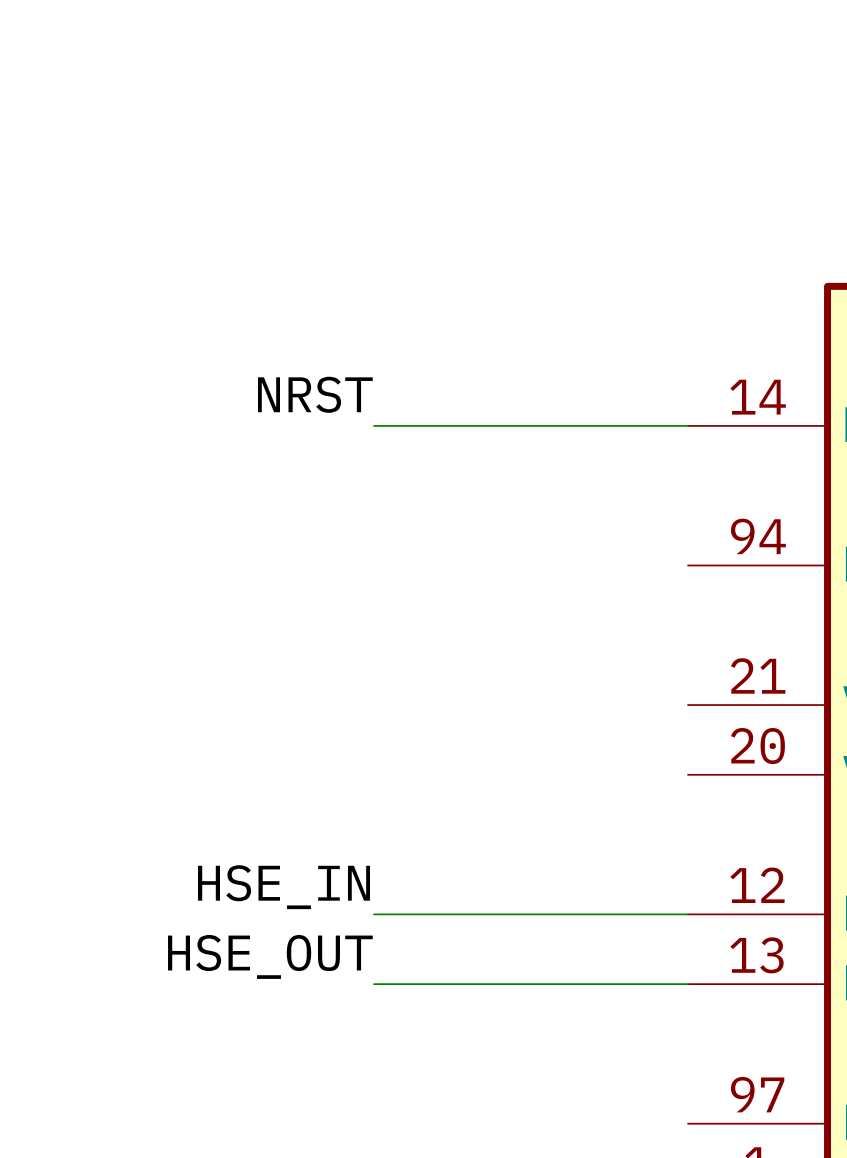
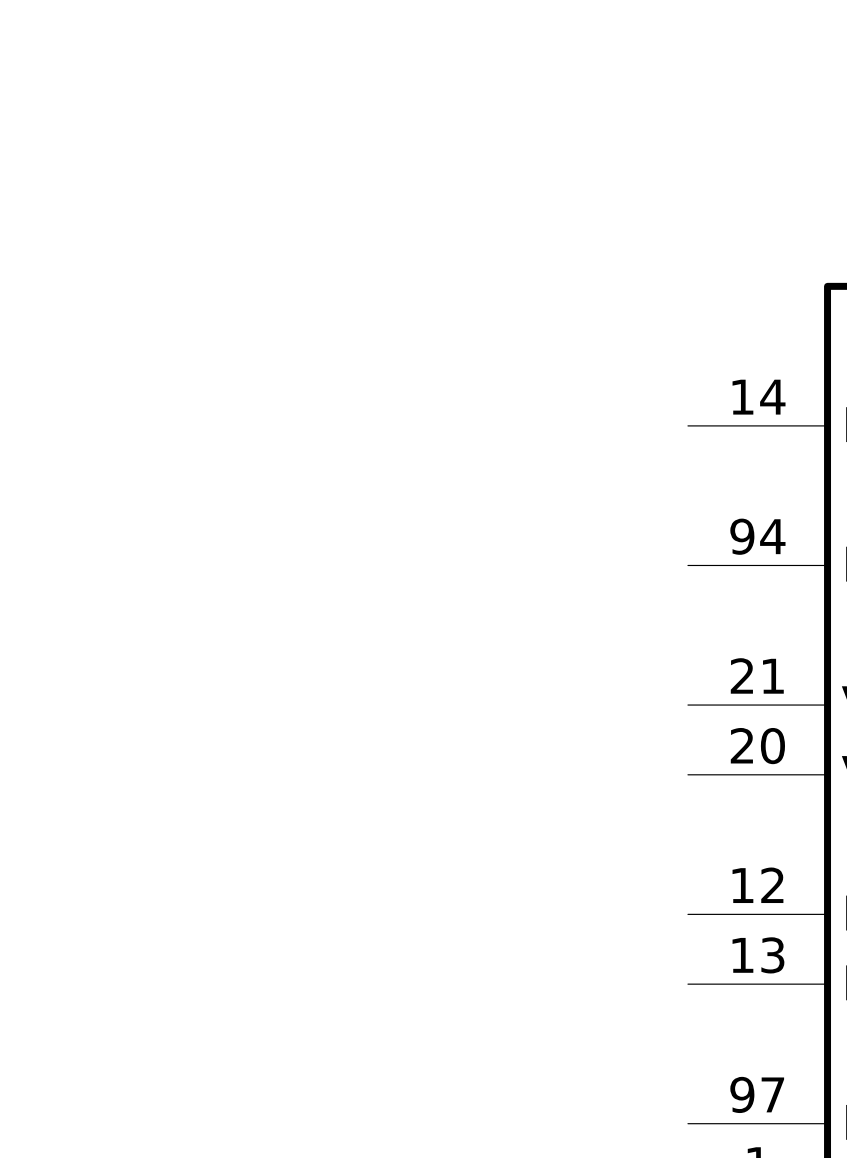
label: NRST (315, 394) -> none
wire: (373, 425) (687, 425) -> none
label: HSE_IN (283, 887) -> none
wire: (373, 914) (687, 914) -> none
label: HSE_OUT (270, 956) -> none
wire: (373, 984) (687, 984) -> none

